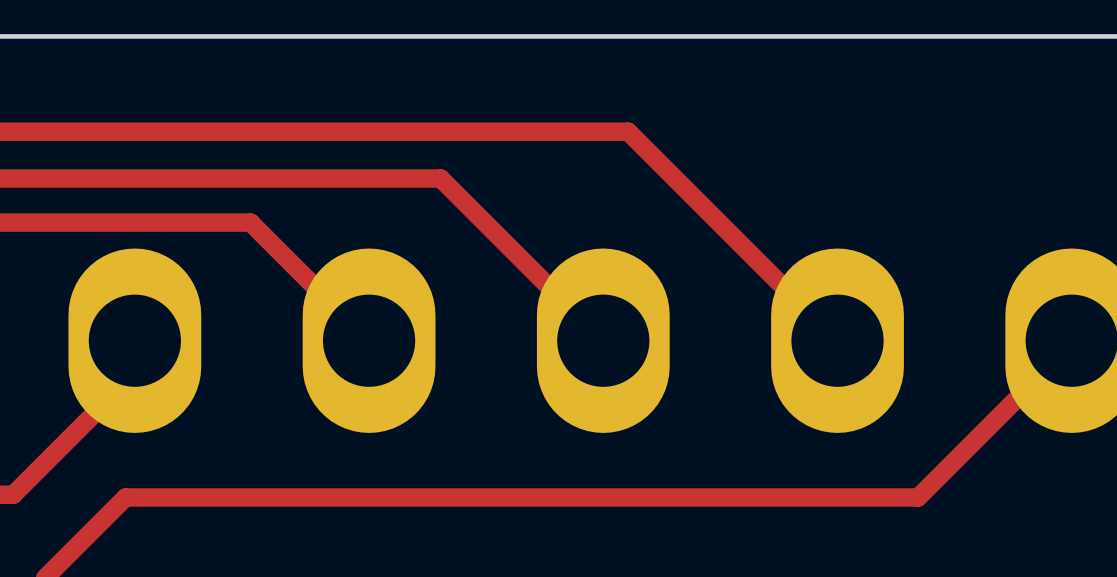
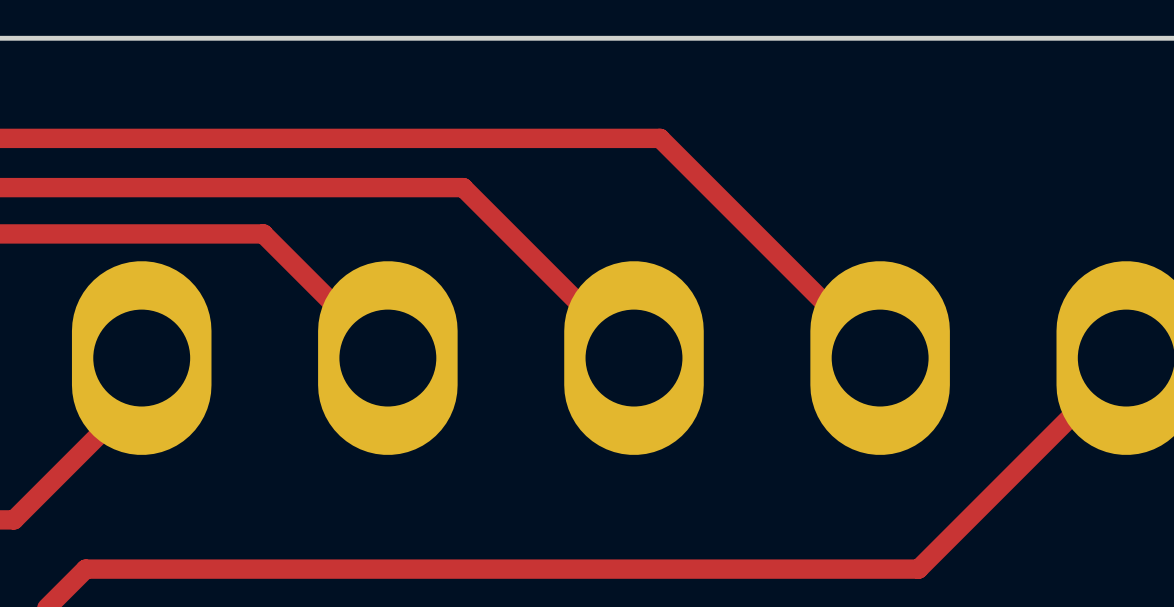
top track: (918, 497) (125, 497) (81, 541) -> (964, 522) (918, 569) (85, 569)

